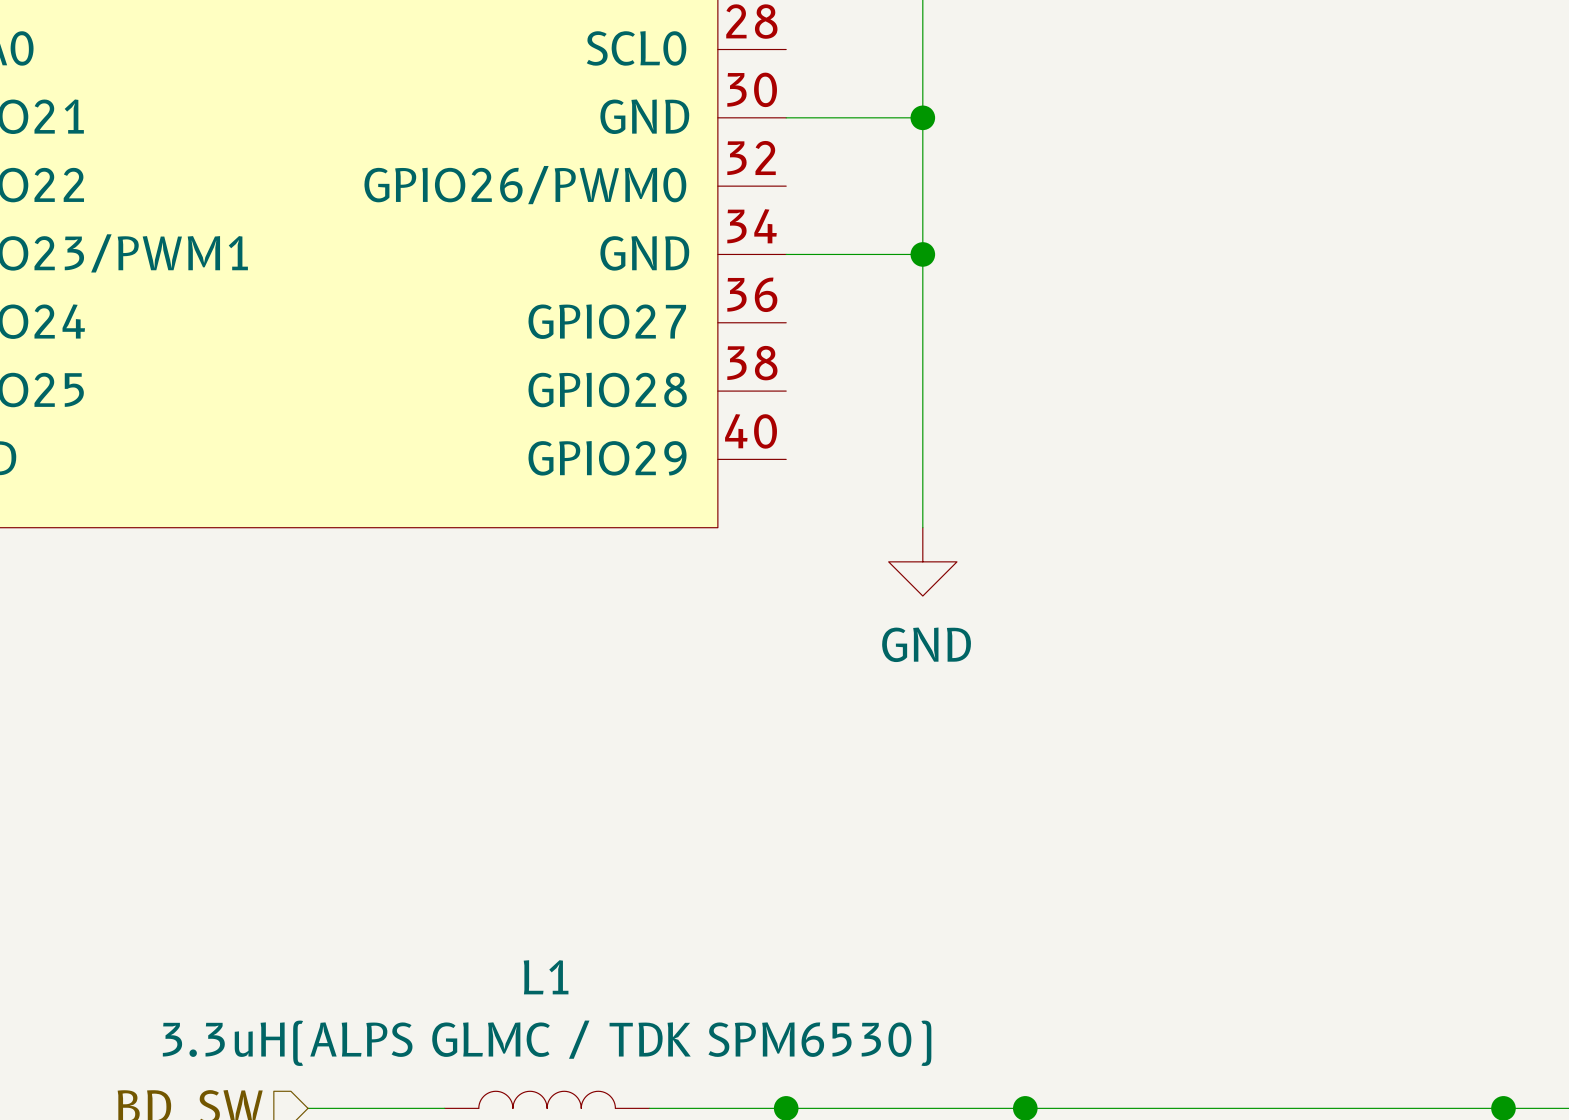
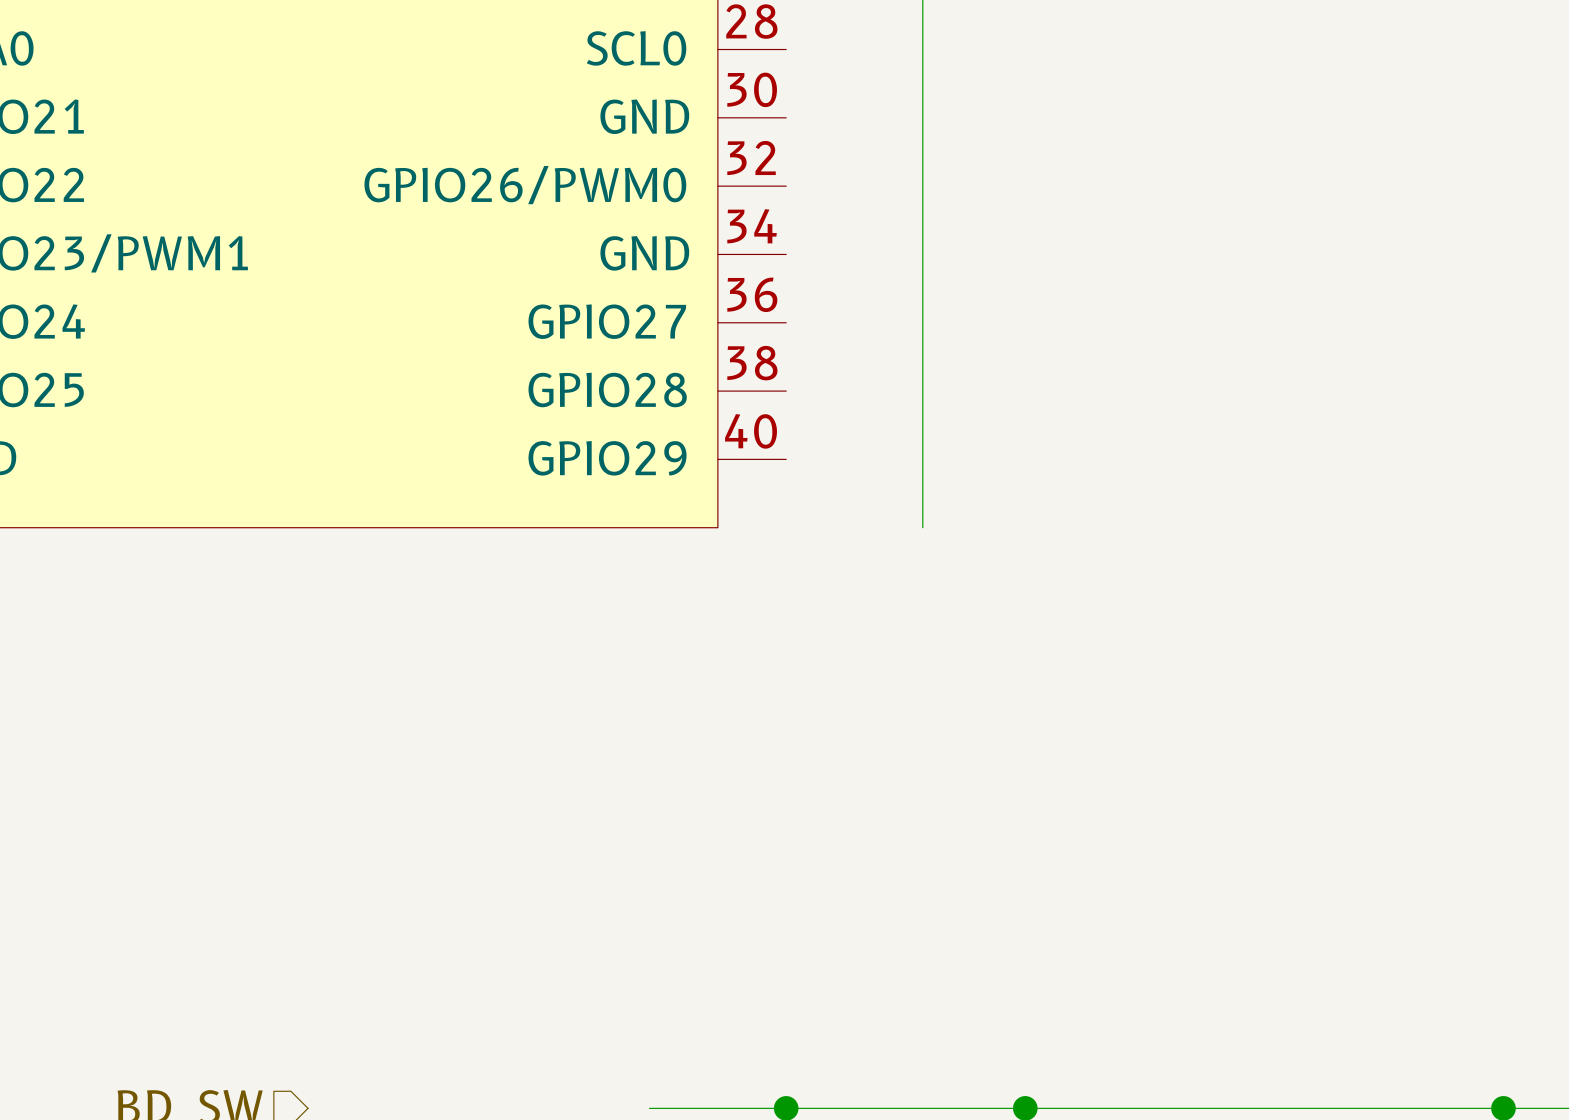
wire: (786, 117) (922, 117) -> none
junction: (922, 117) -> none
wire: (786, 254) (922, 254) -> none
junction: (922, 254) -> none
power symbol: GND (922, 561) -> none
L1: 3.3uH(ALPS GLMC / TDK SPM6530) (547, 1099) -> none
wire: (308, 1108) (444, 1108) -> none

